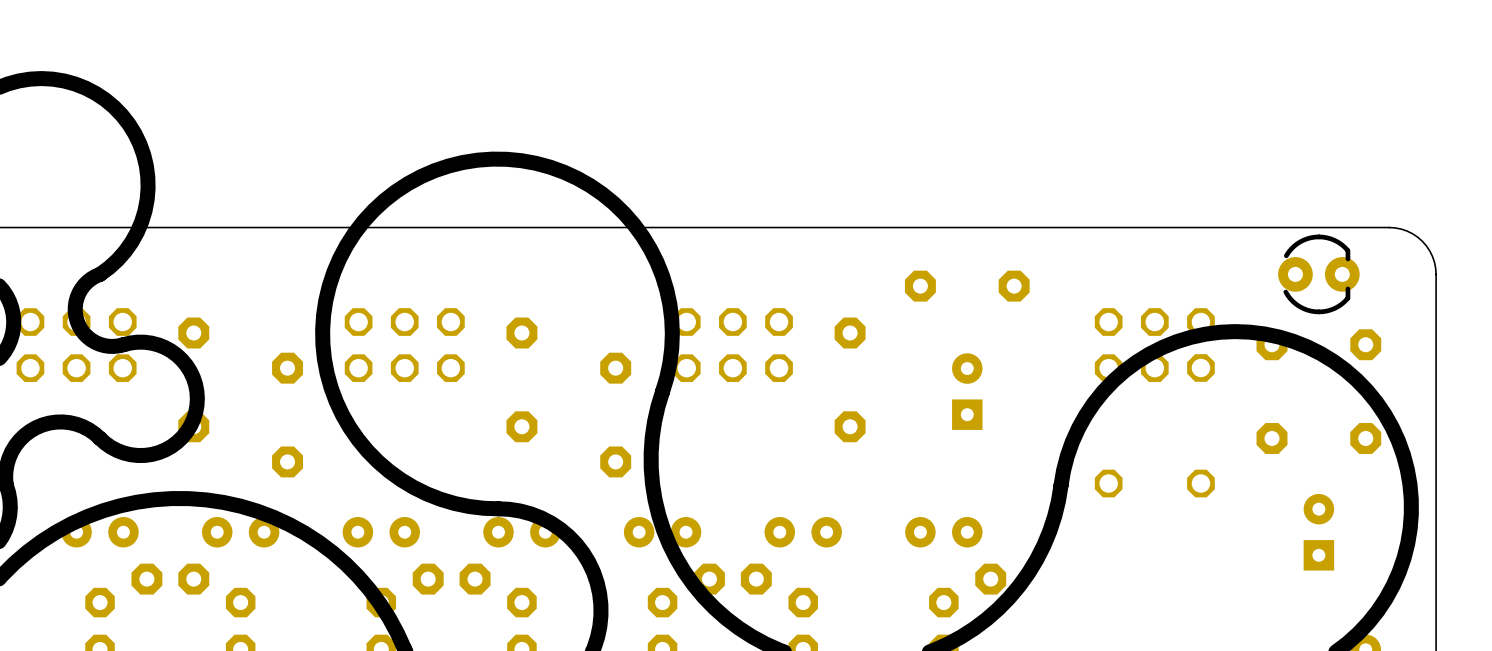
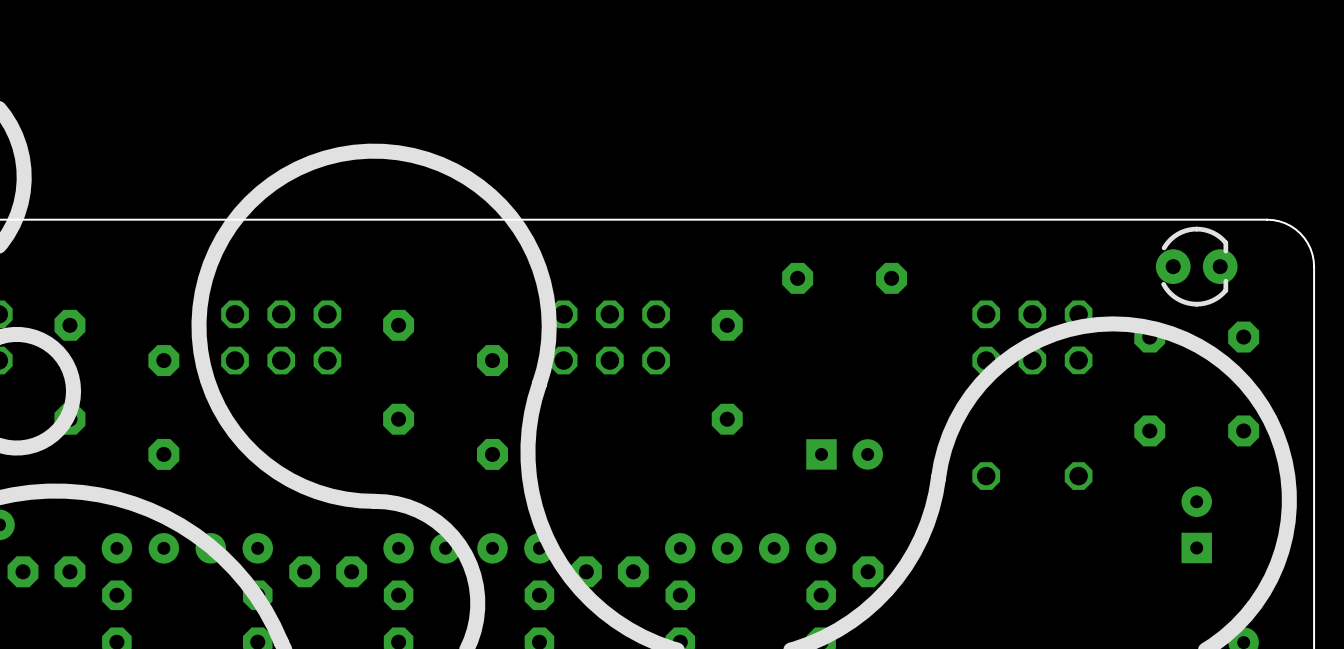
part rotation: 0° (967, 391) -> 90° clockwise (844, 454)
part position: (967, 391) -> (844, 454)
part position: (240, 532) -> (140, 548)
part position: (381, 532) -> (234, 548)
part position: (521, 532) -> (422, 548)
part position: (662, 532) -> (515, 548)
part position: (803, 532) -> (703, 548)
part position: (943, 532) -> (797, 548)

